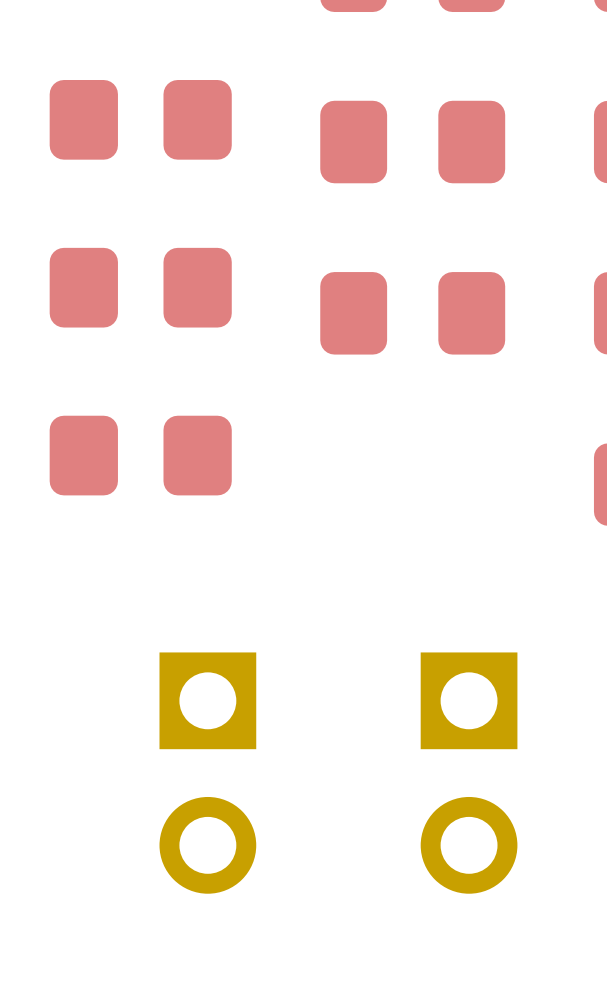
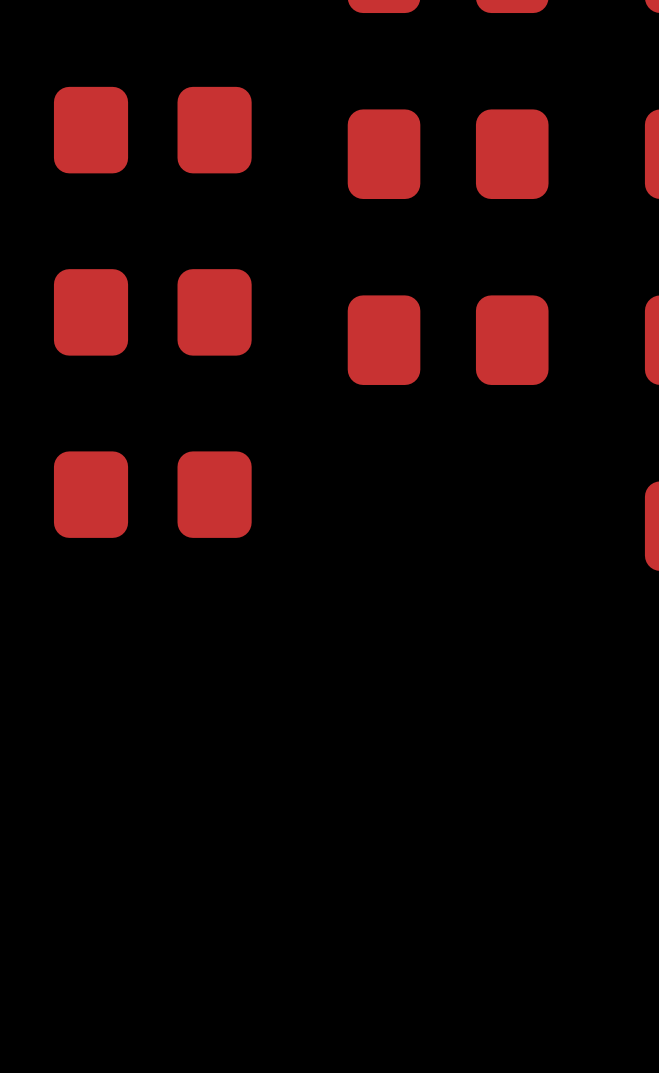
part: (207, 773) -> none
part: (469, 773) -> none

